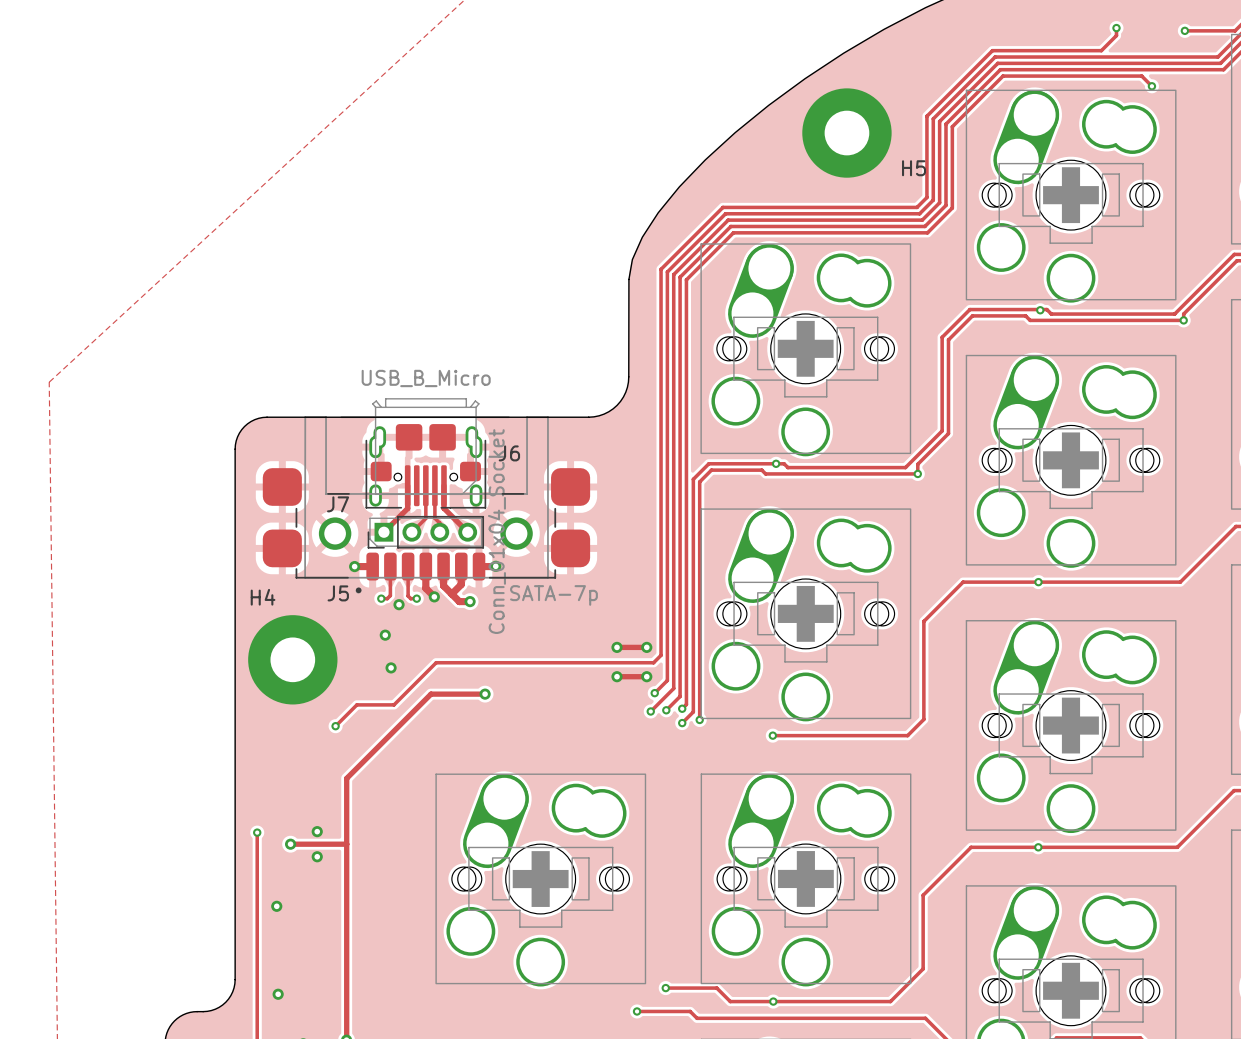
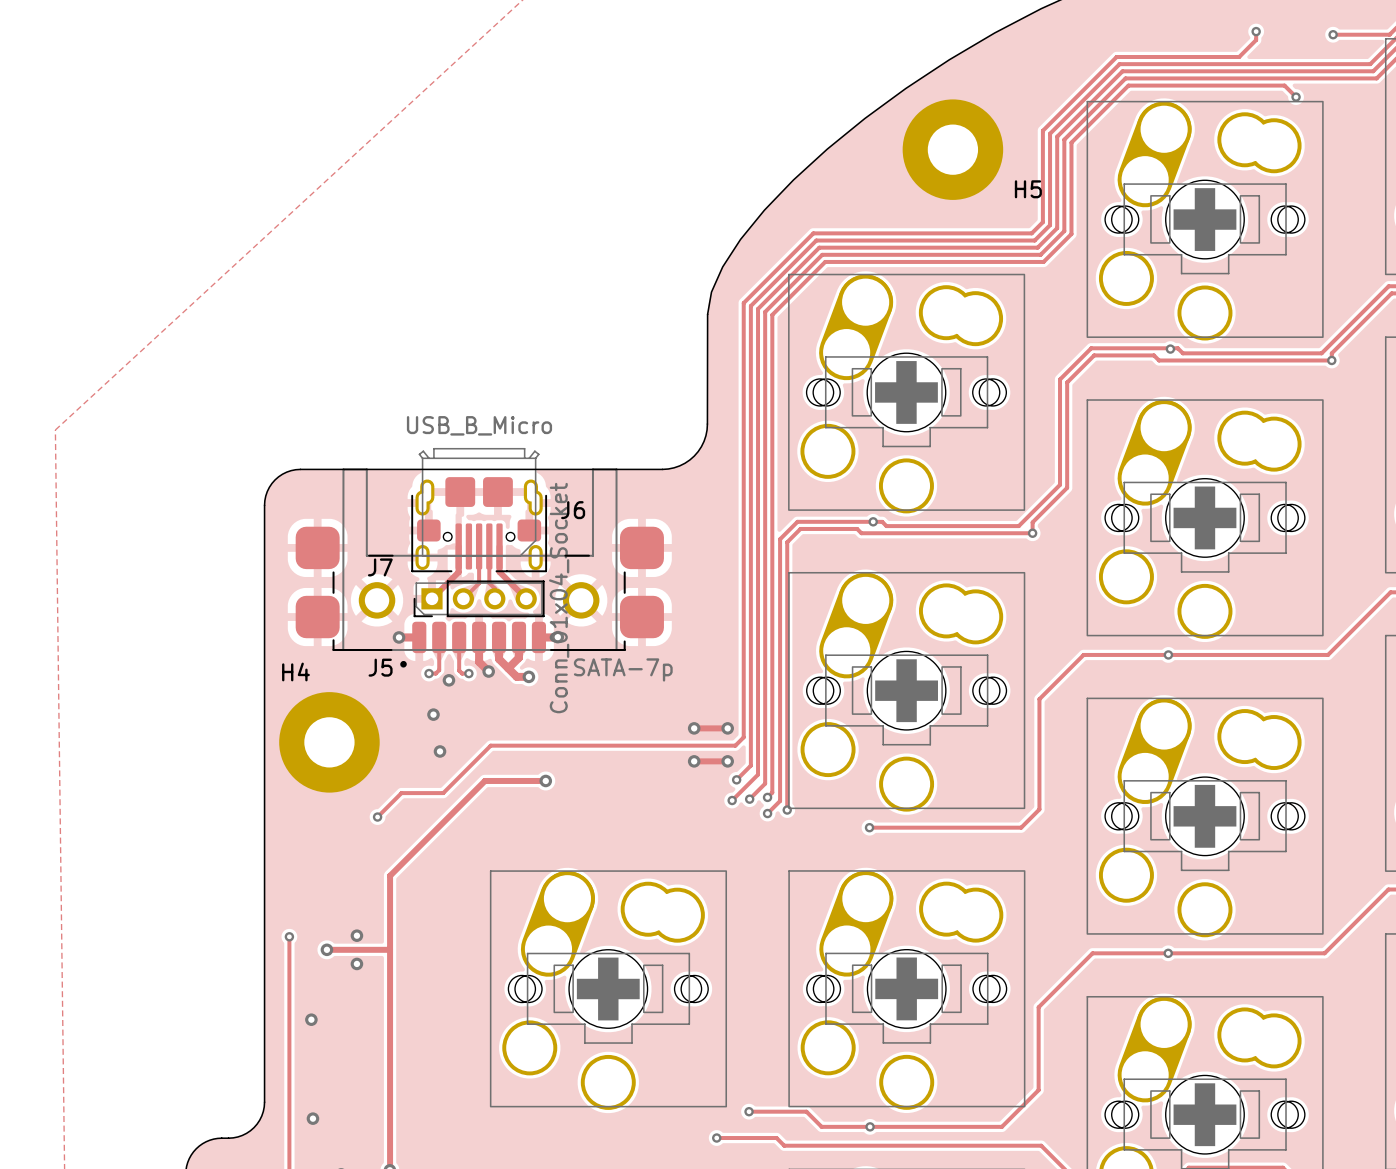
J5 footprint: [262, 416, 591, 594] -> [295, 468, 664, 668]

